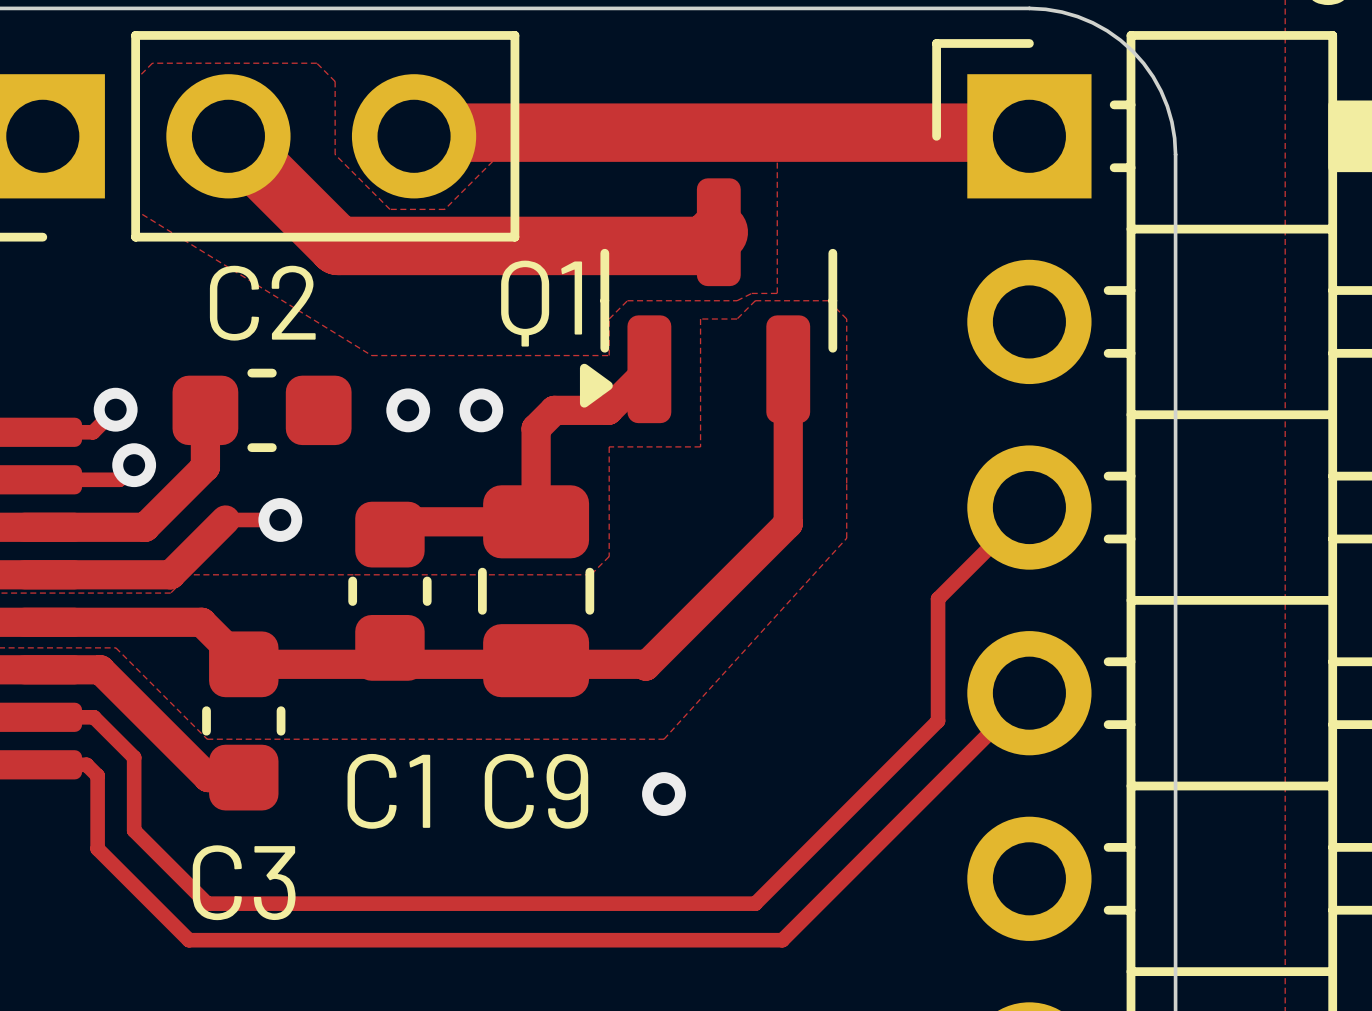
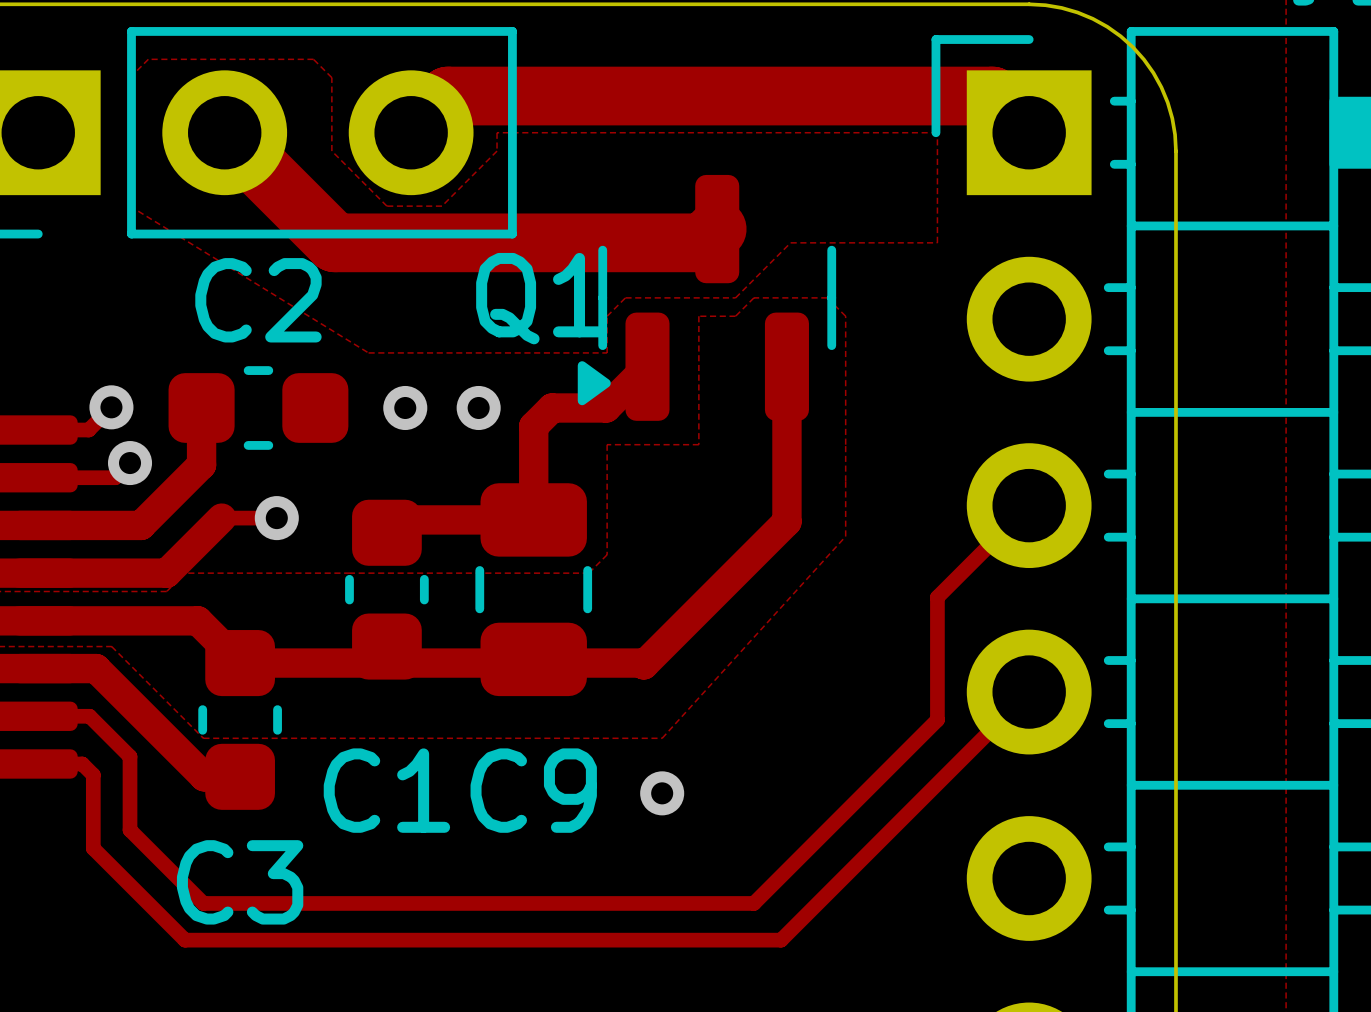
track: (417, 132) (1025, 132) -> (414, 129) (447, 96) (992, 96) (1025, 129)
zone outline: (777, 136) (777, 293) (751, 293) (737, 300) -> (775, 132) (937, 132) (937, 242) (790, 242) (735, 297)

